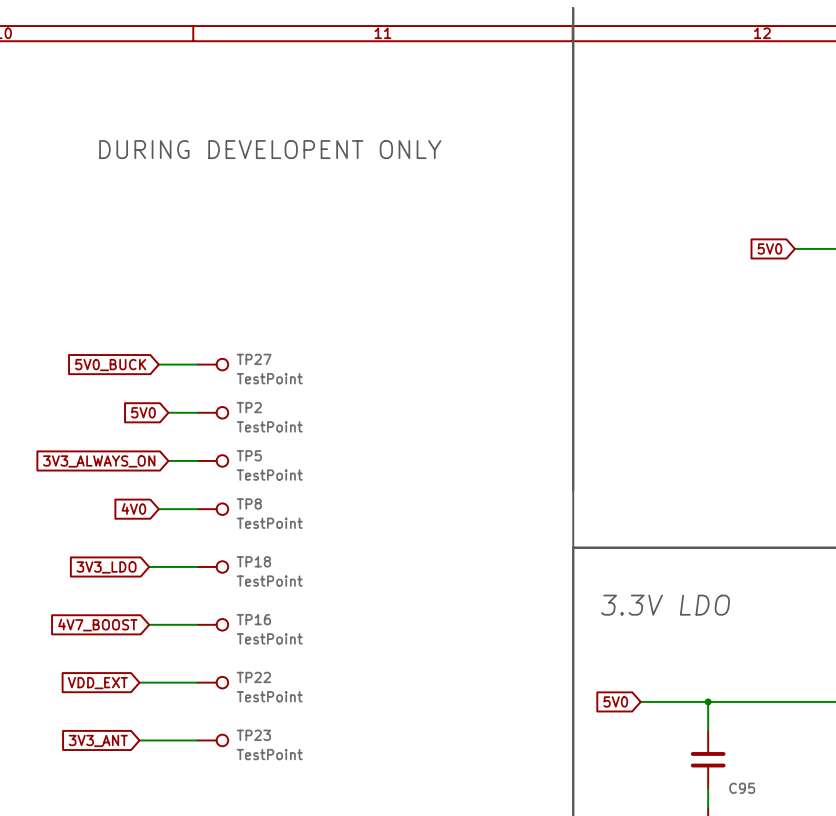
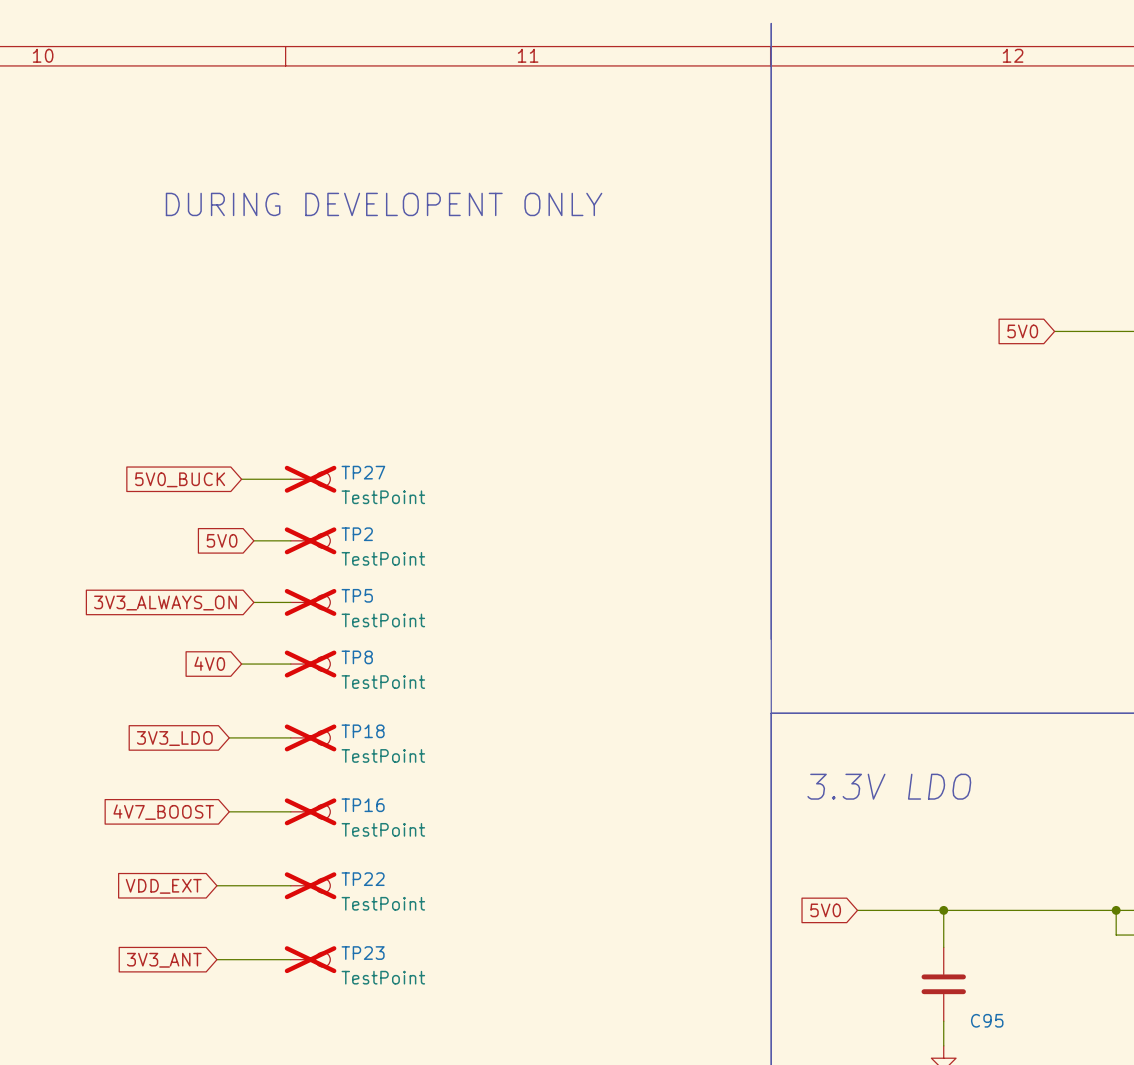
TP27 do-not-place cross: none -> (310, 479)
TP2 do-not-place cross: none -> (310, 540)
TP5 do-not-place cross: none -> (310, 602)
TP8 do-not-place cross: none -> (310, 664)
TP18 do-not-place cross: none -> (310, 737)
TP16 do-not-place cross: none -> (310, 811)
TP22 do-not-place cross: none -> (310, 885)
TP23 do-not-place cross: none -> (310, 959)

